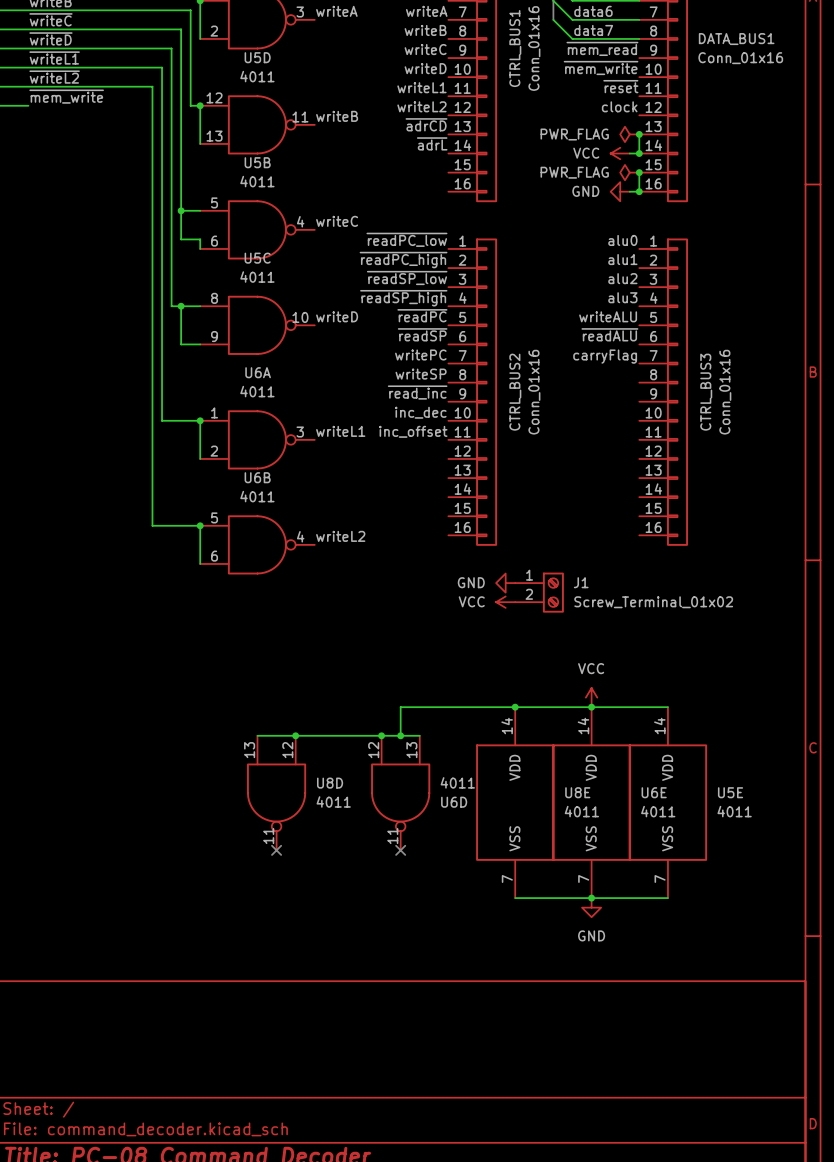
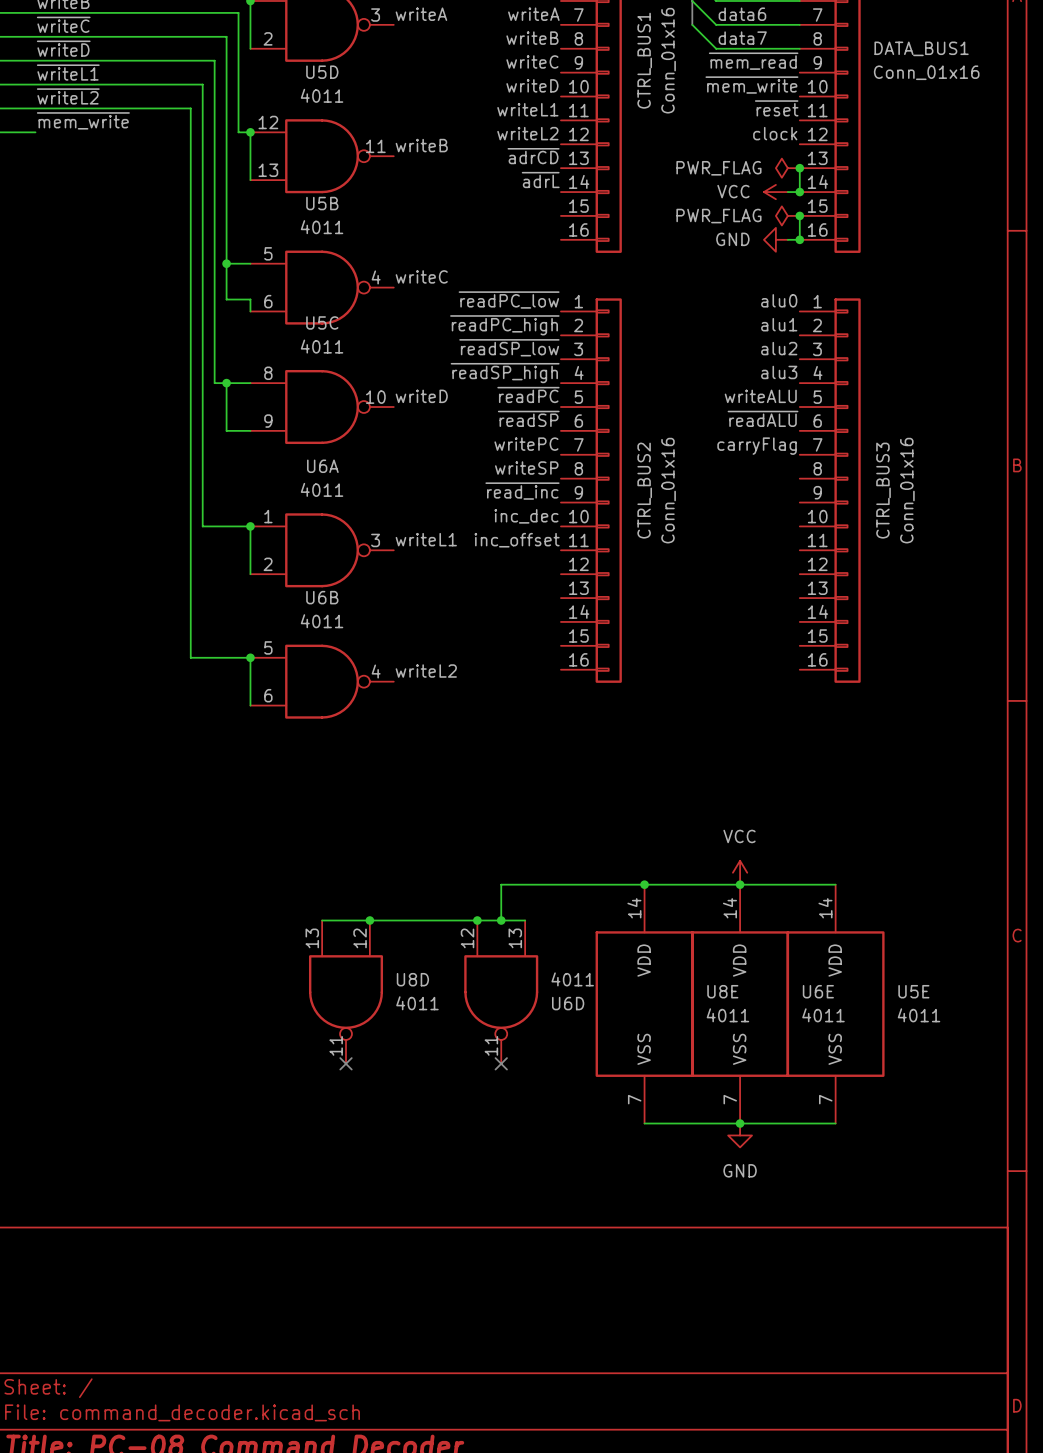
power symbol: GND (505, 583) -> none
J1: Screw_Terminal_01x02 (539, 592) -> none
power symbol: VCC (505, 602) -> none

